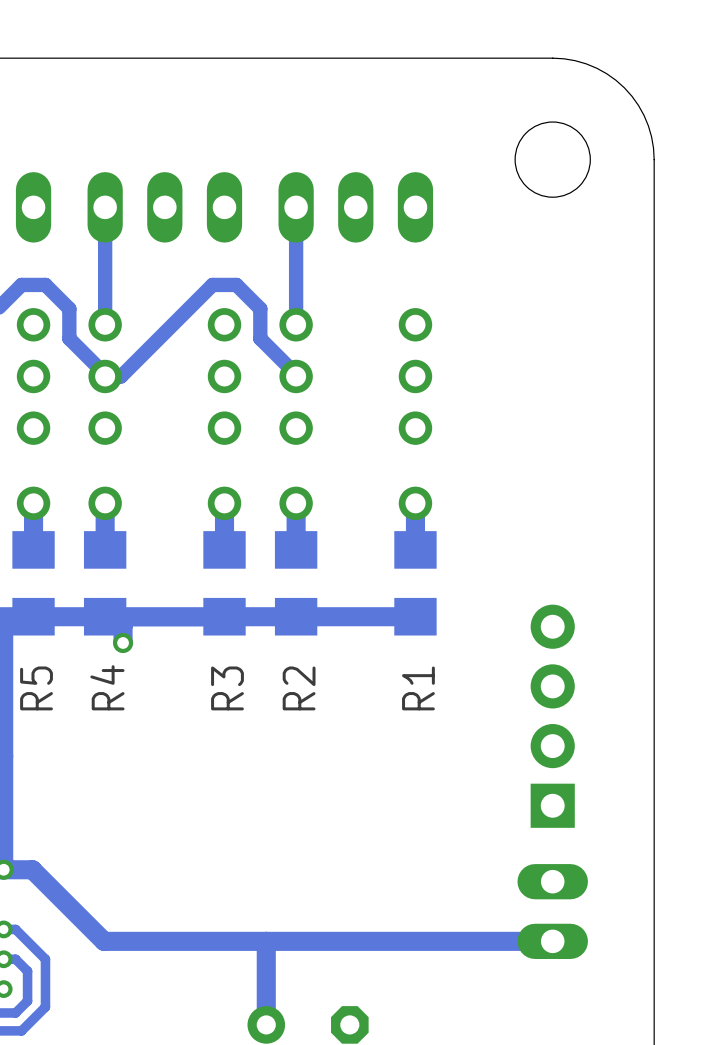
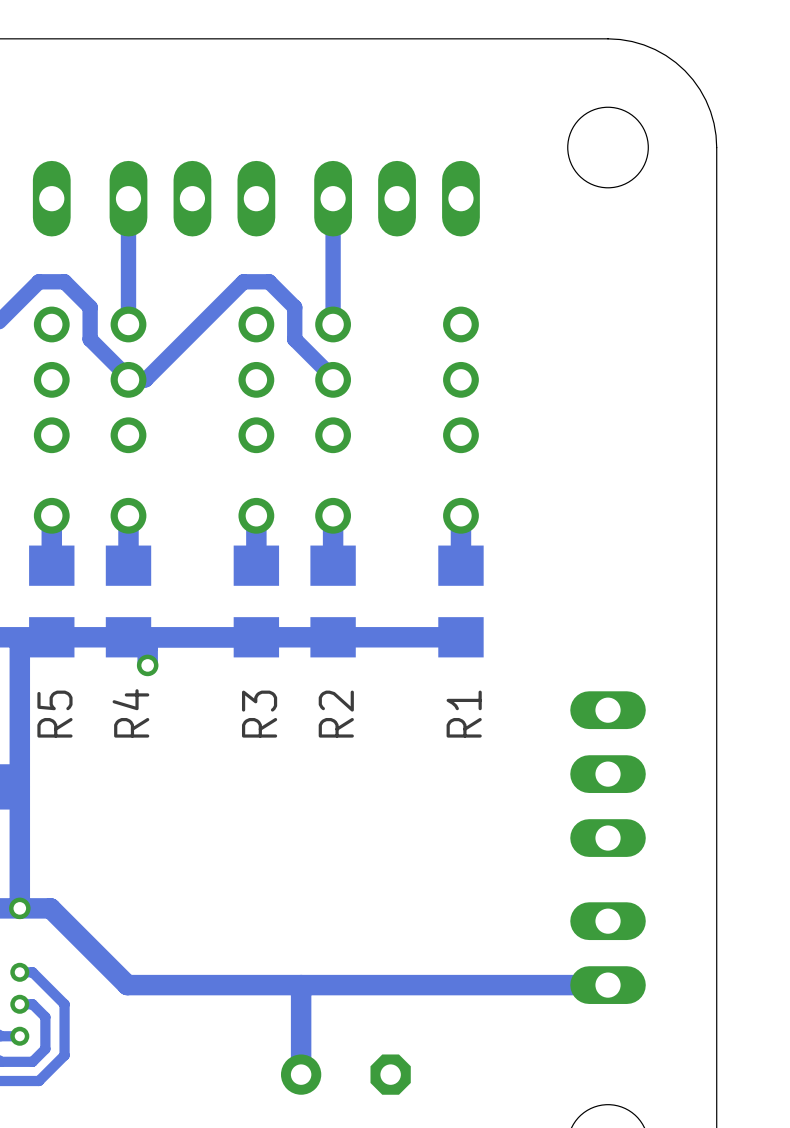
part: (552, 716) -> none
part: none -> (608, 774)

